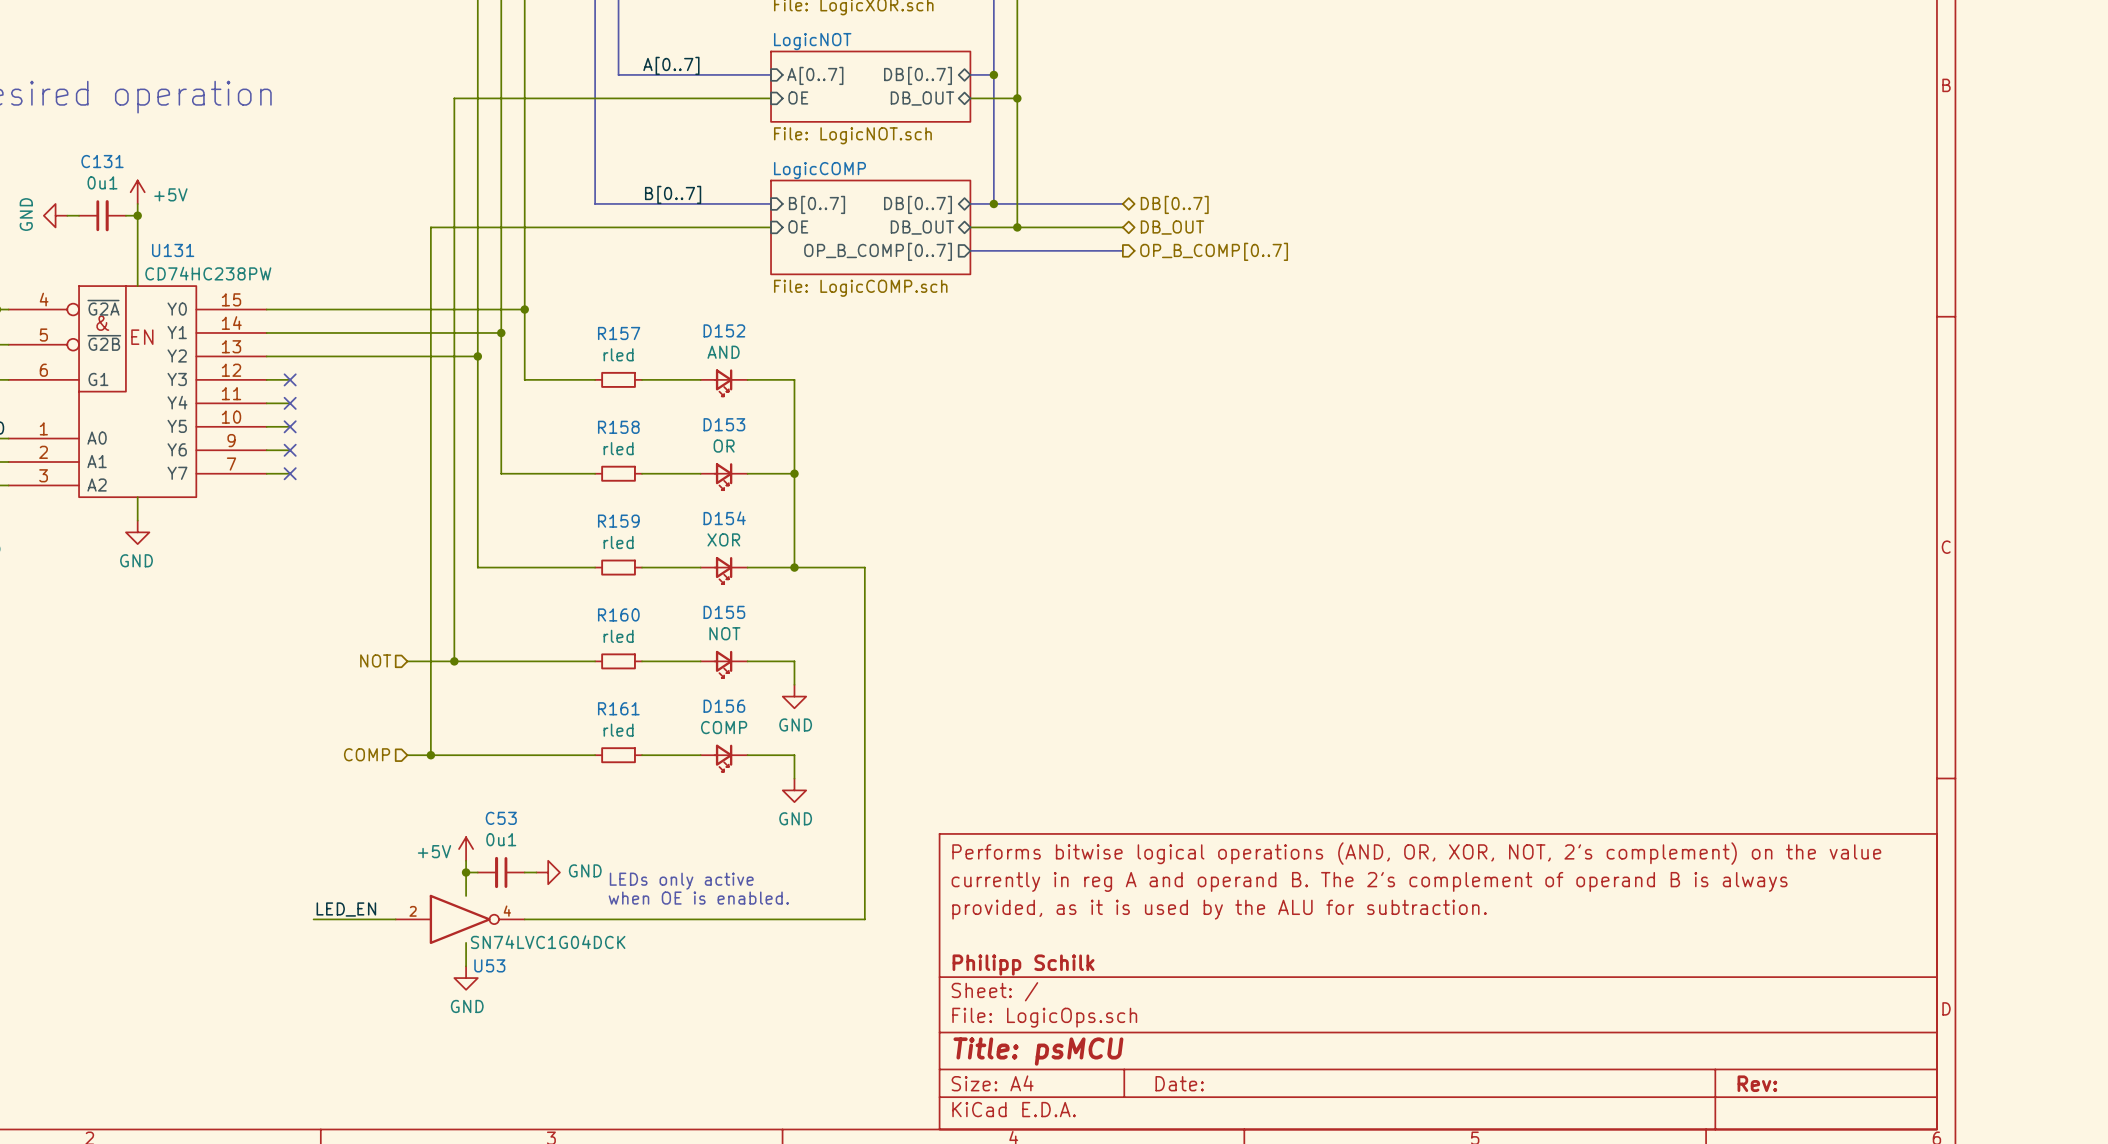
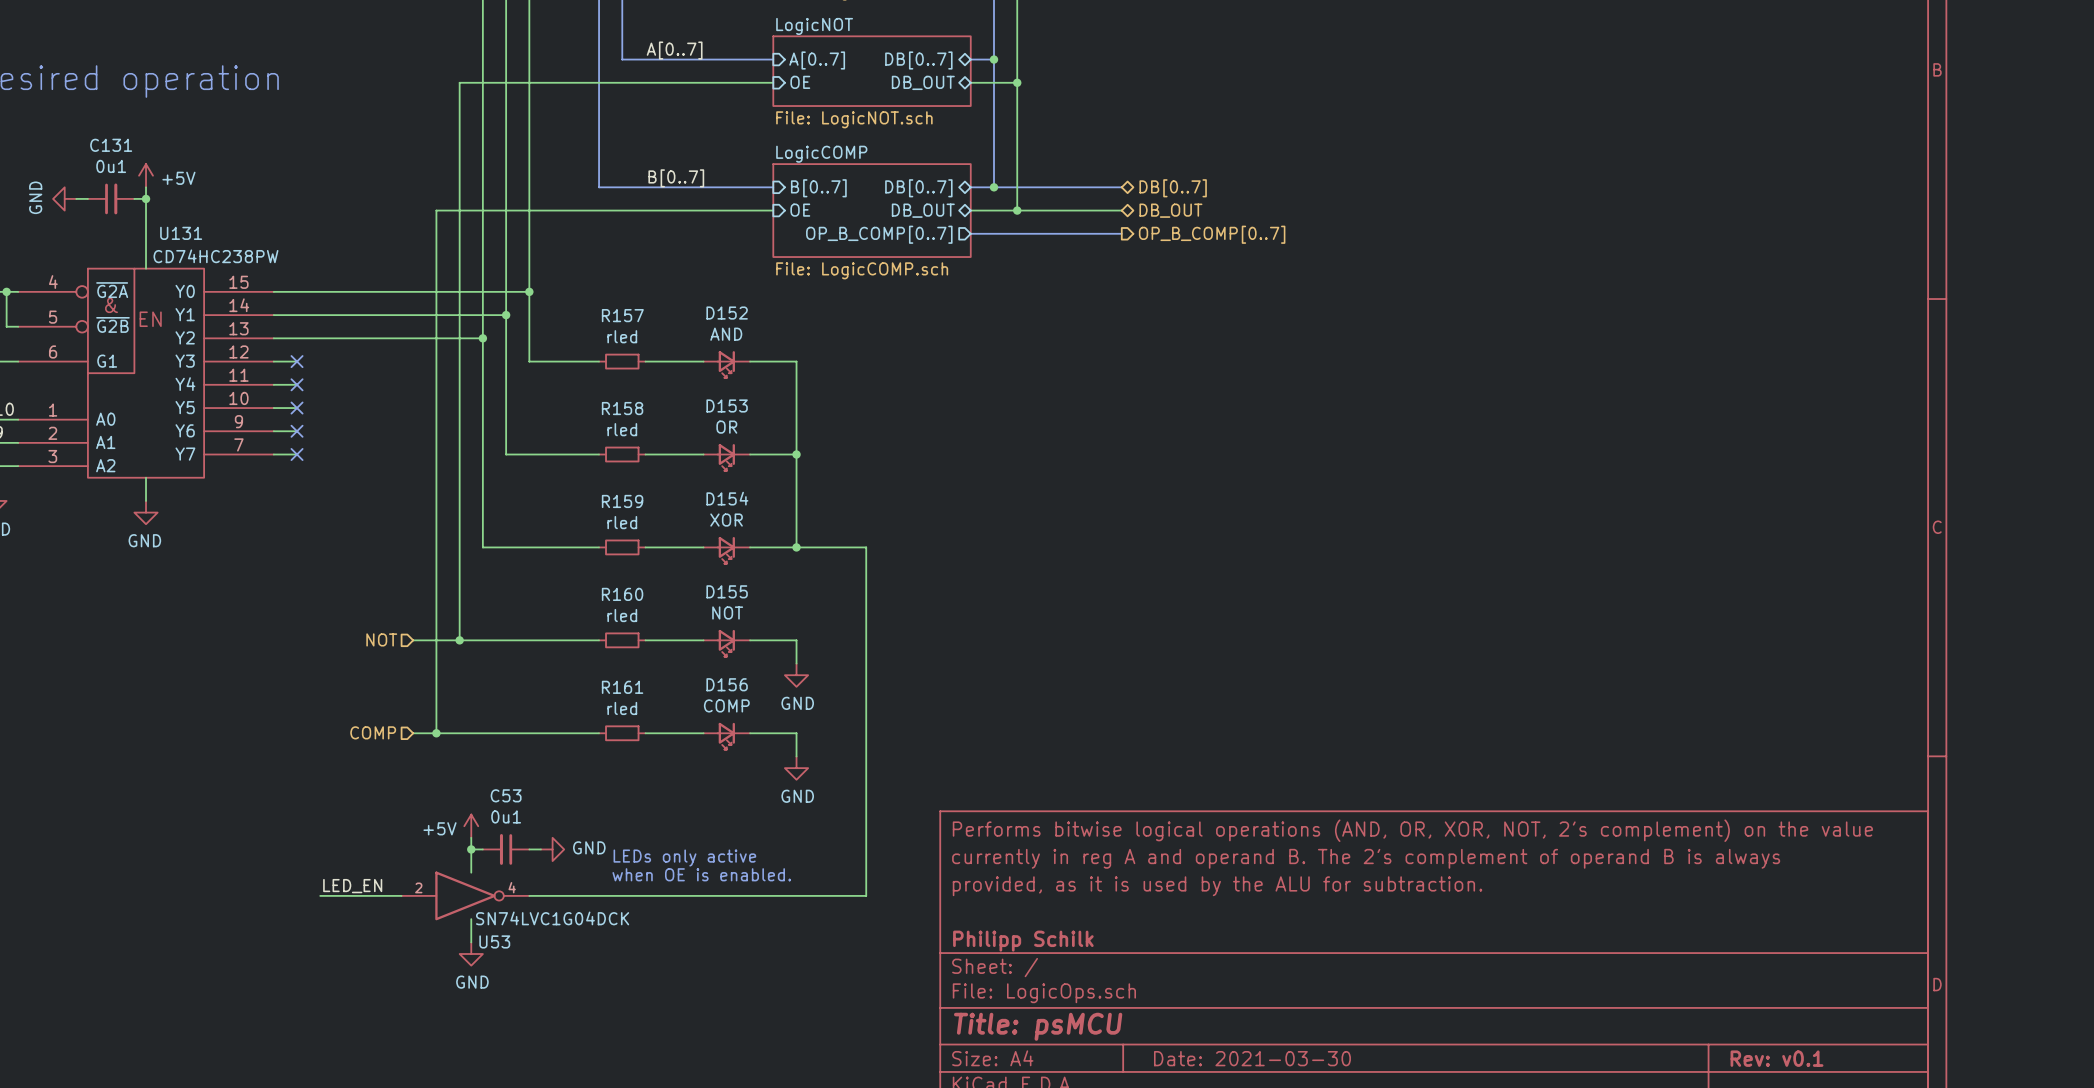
title block: Date: (1179, 1083) -> Date: 2021-03-30 (1252, 1058)
title block: Rev: (1757, 1083) -> Rev: v0.1 (1777, 1058)

